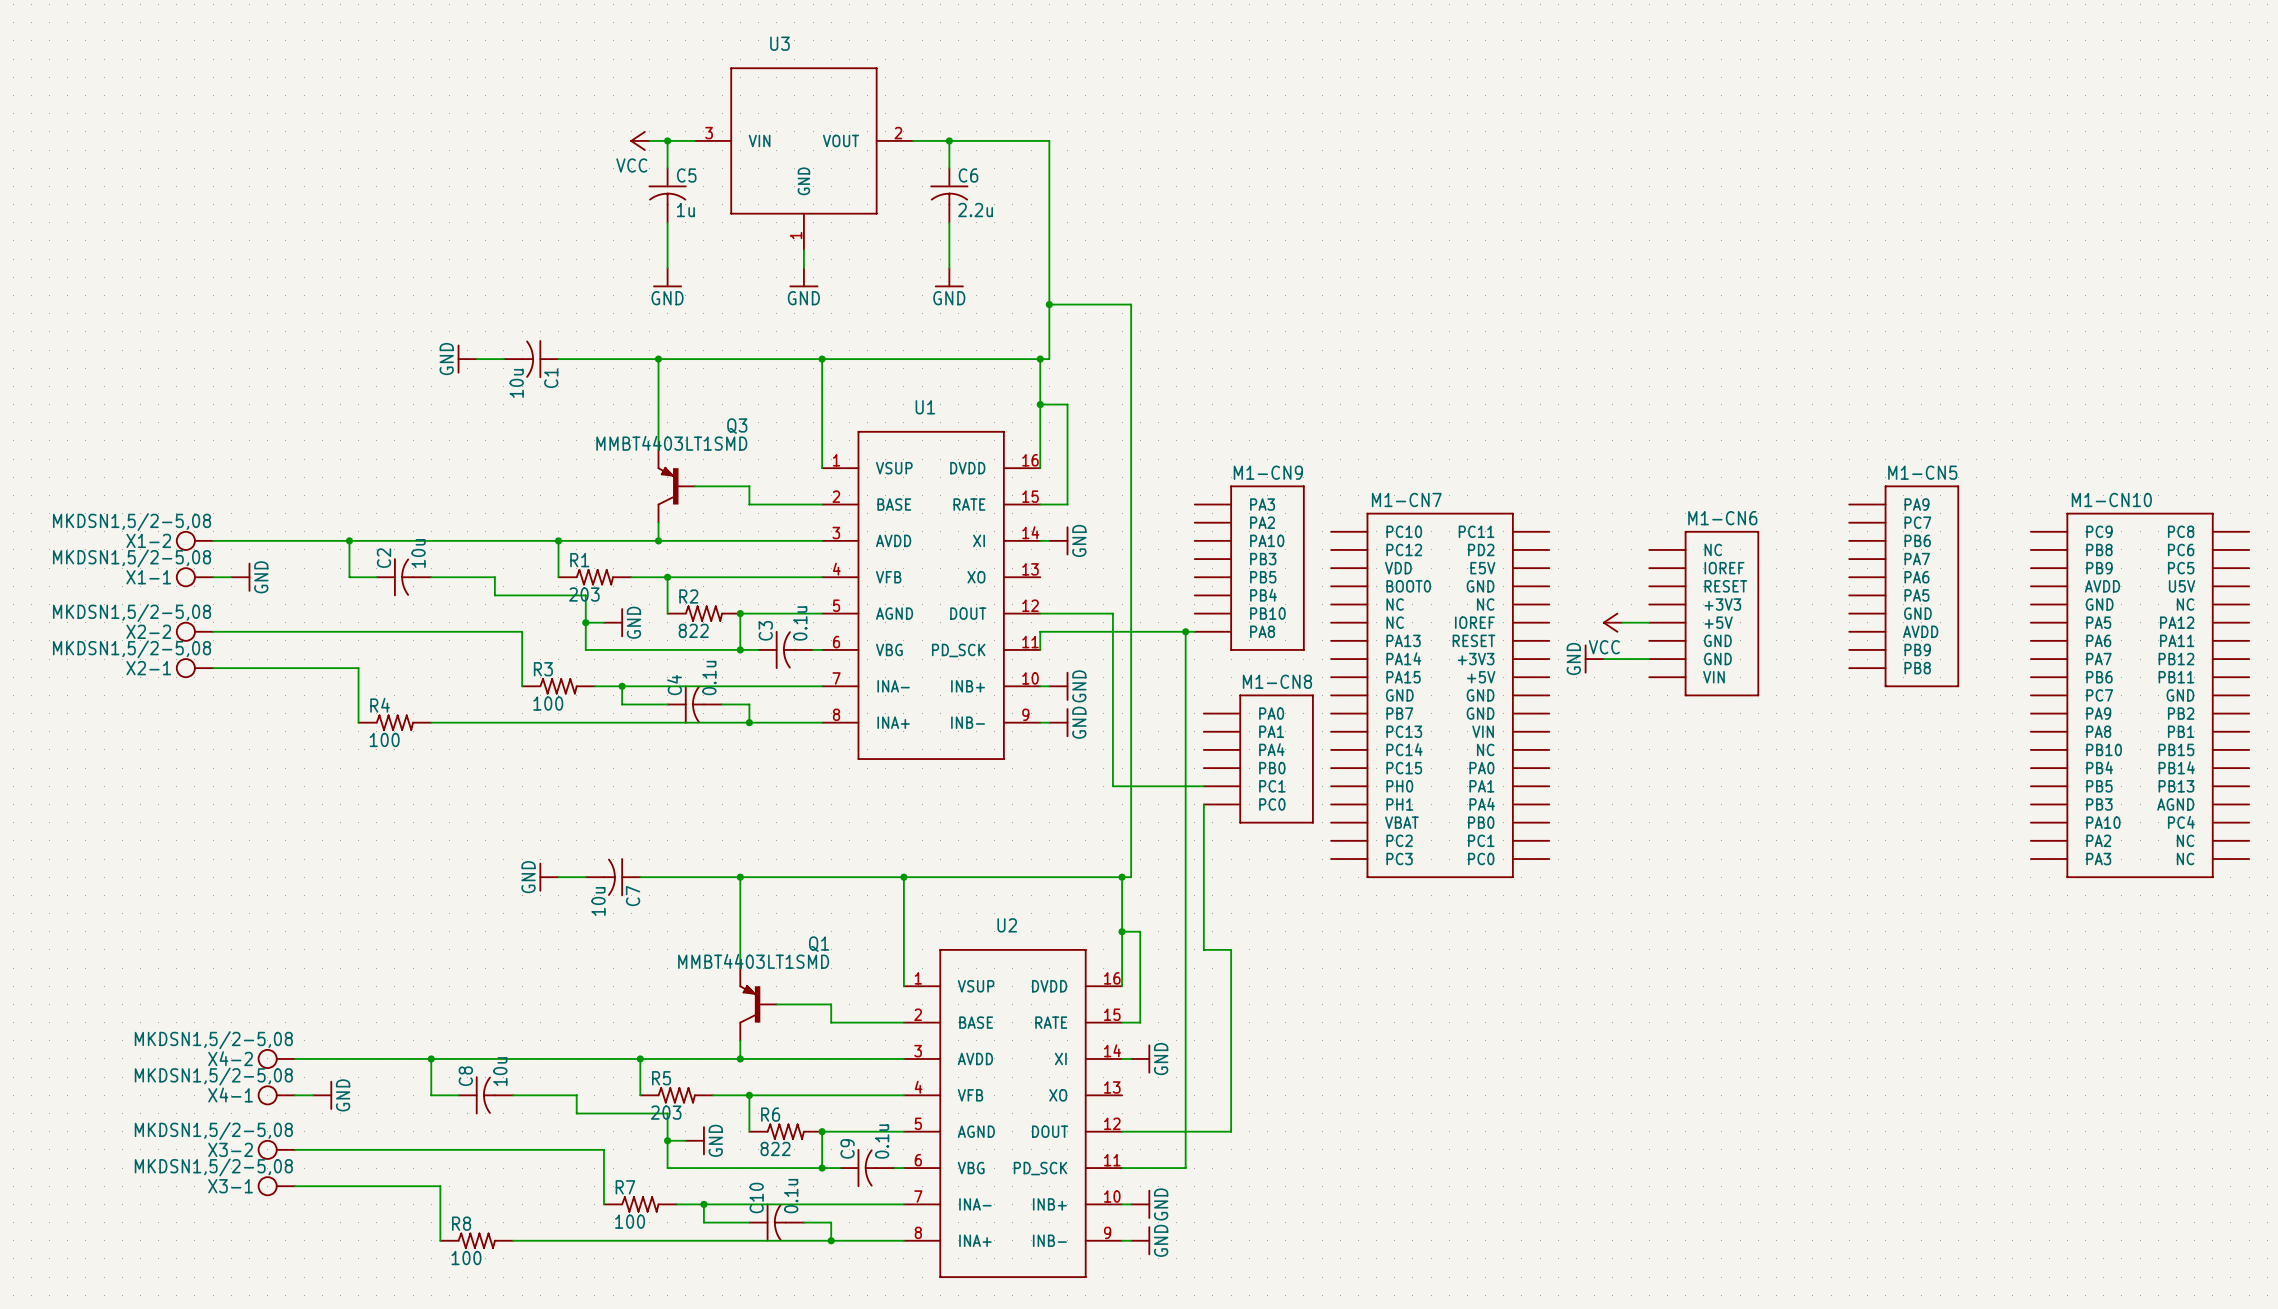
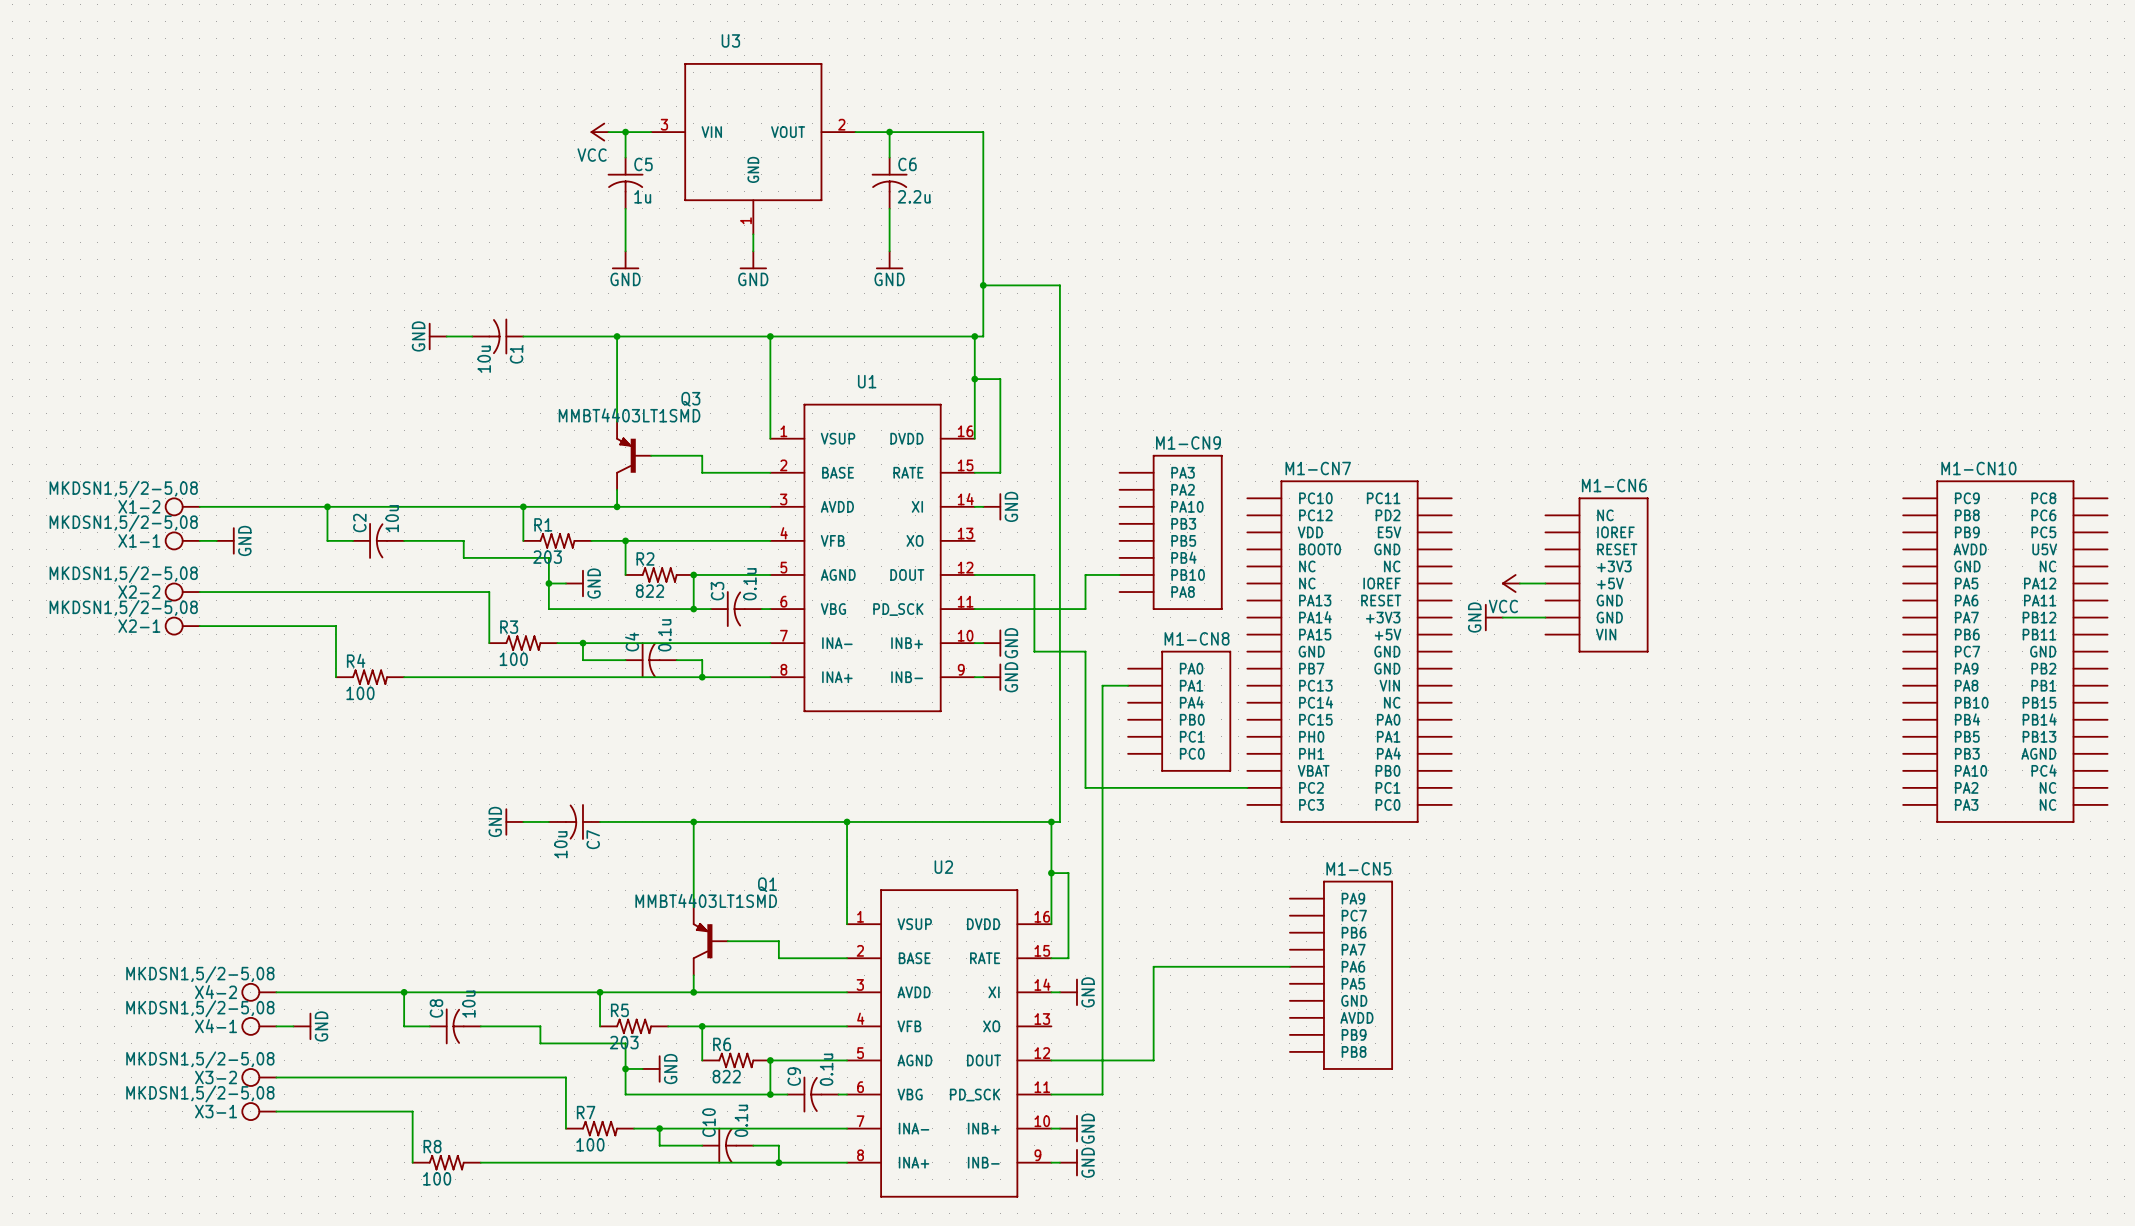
M1-CN5 position: (1904, 586) -> (1341, 975)
wire: (1103, 613) (1112, 613) (1112, 786) (1203, 786) -> (1034, 574) (1034, 651) (1085, 651) (1085, 787) (1247, 787)
wire: (1185, 631) (1185, 1168) (1176, 1168) -> (1128, 685) (1102, 685) (1102, 1094)
junction: (1185, 631) -> none
wire: (1194, 631) (1040, 631) (1040, 649) -> (1119, 574) (1085, 574) (1085, 609) (974, 609)
wire: (1203, 804) (1203, 949) (1231, 949) (1231, 1031) -> (1289, 966) (1153, 966)

